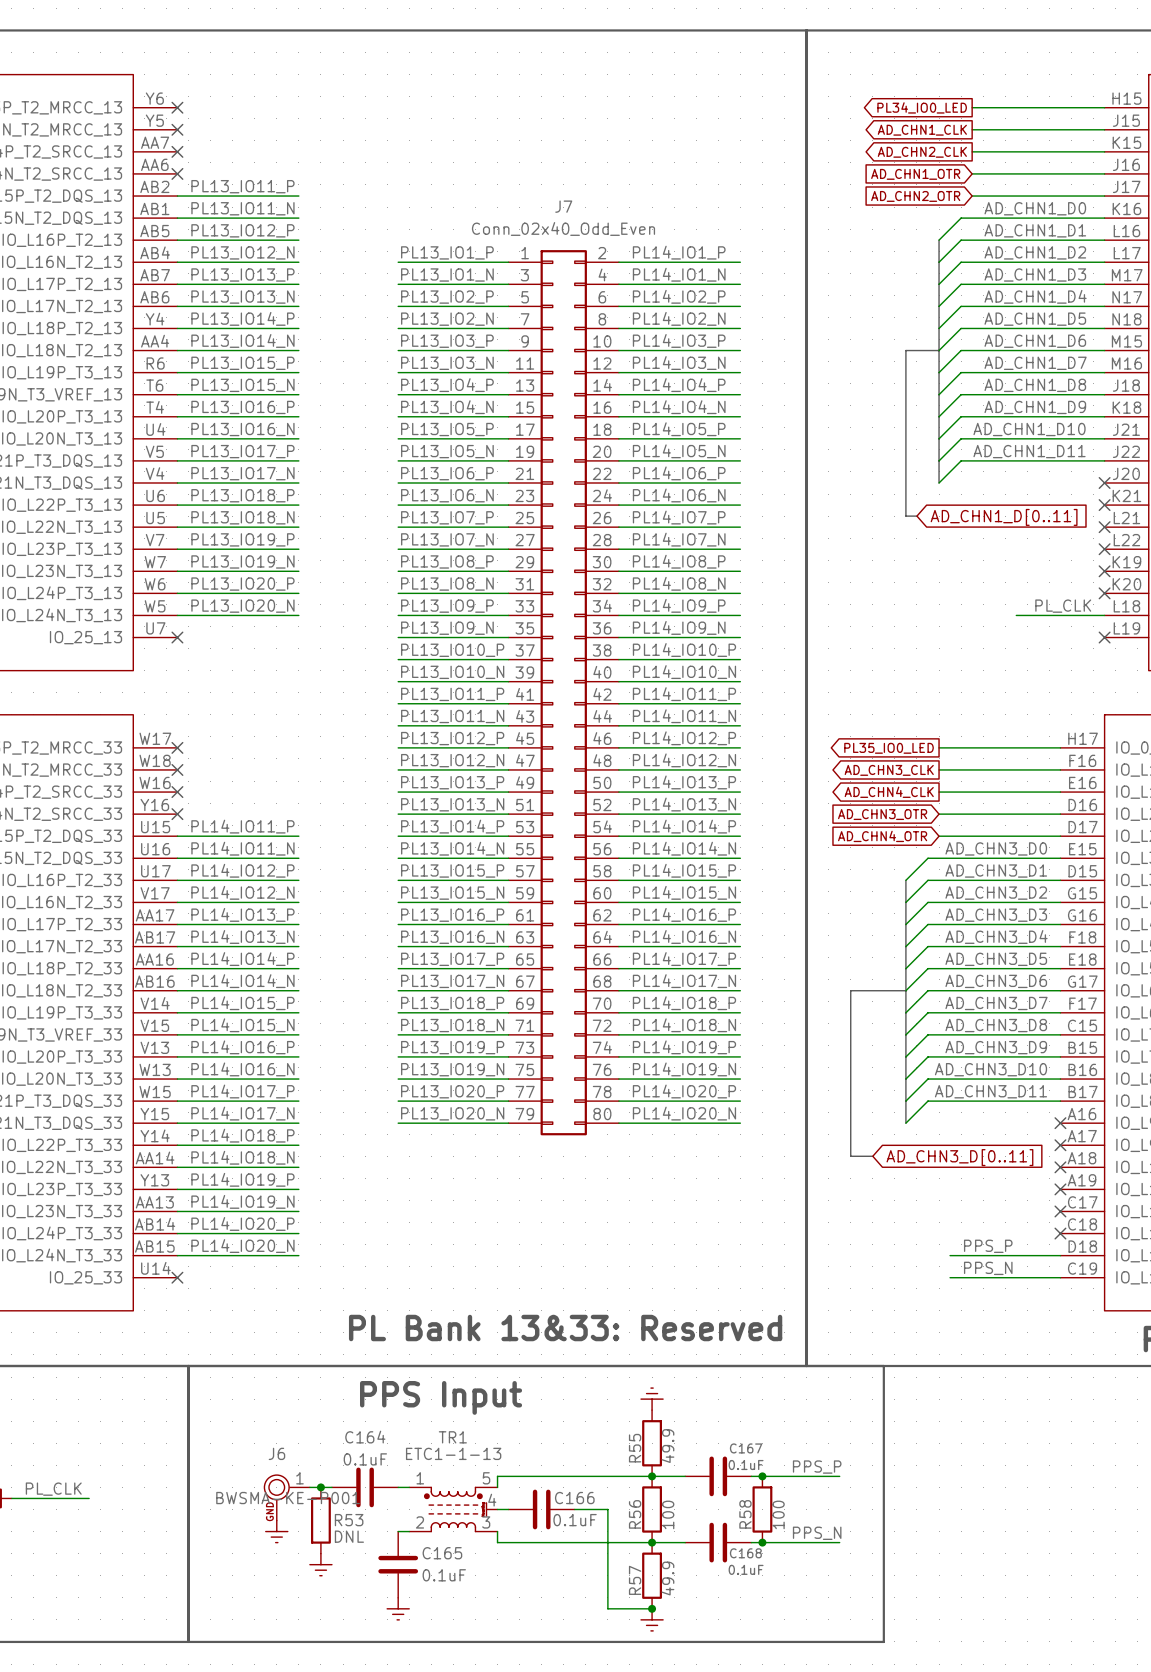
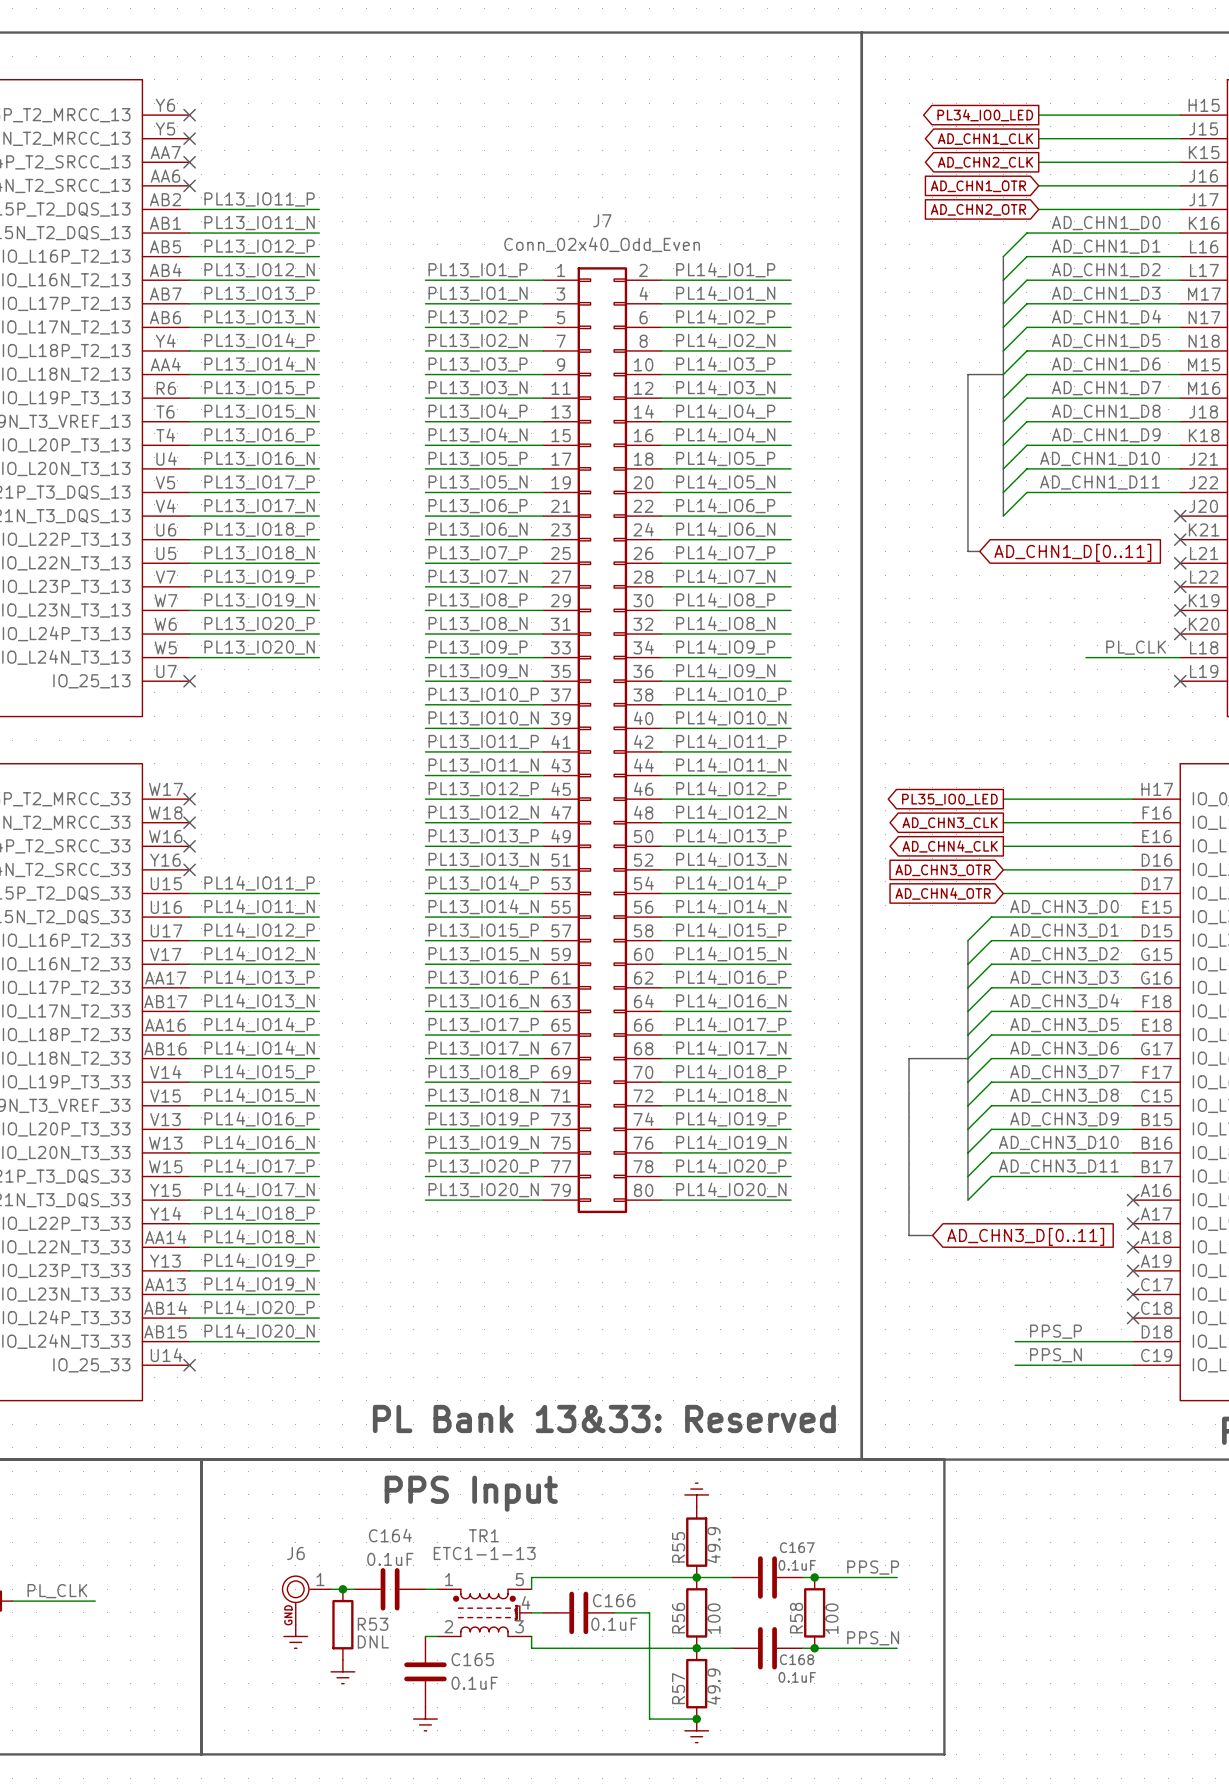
J6 value: BWSMA-KE-P001 (288, 1498) -> none

